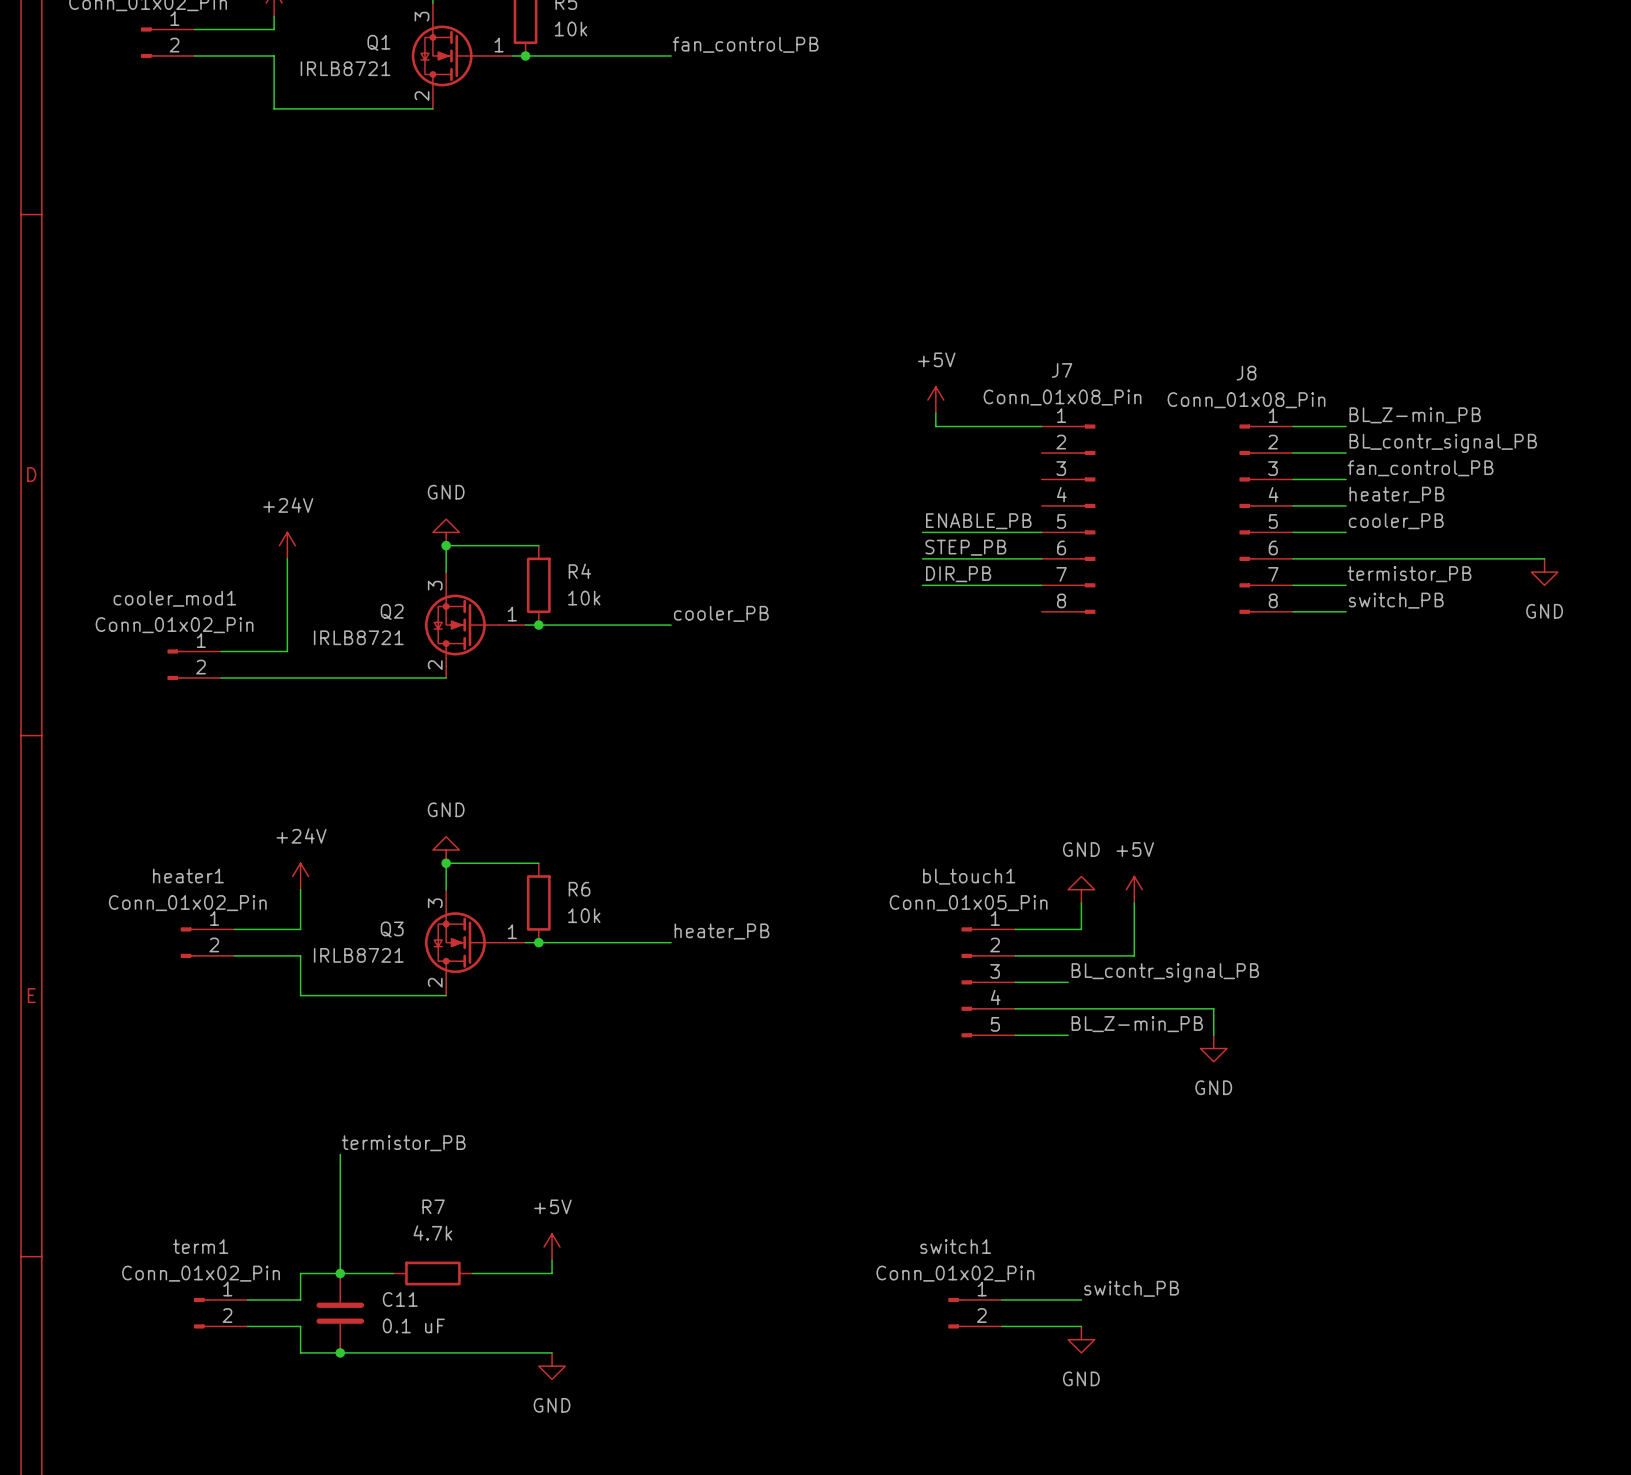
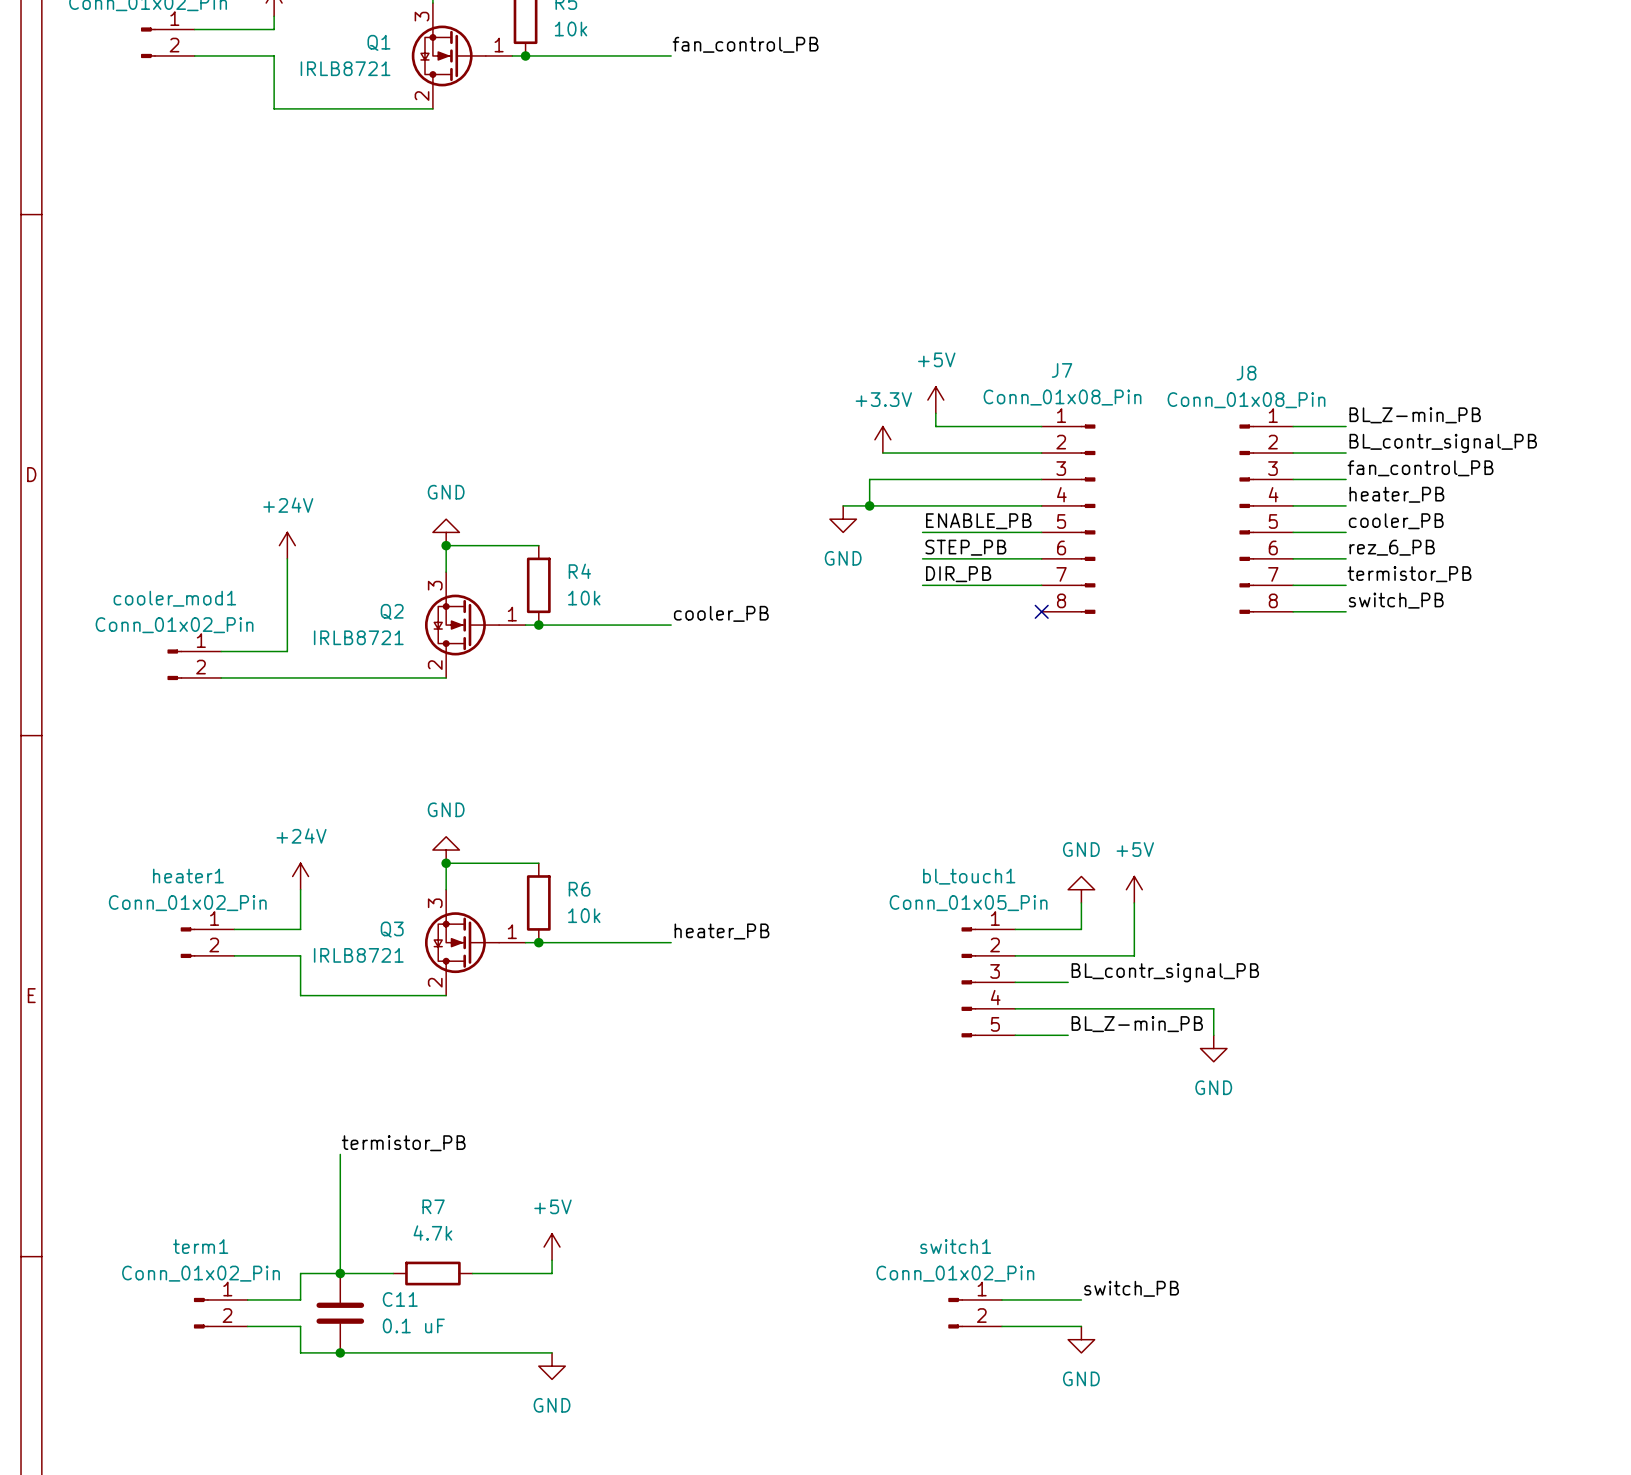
power symbol: none -> +3.3V (882, 439)
wire: none -> (882, 453) (1041, 453)
wire: none -> (1041, 479) (869, 479) (869, 505)
wire: none -> (843, 505) (1041, 505)
junction: none -> (869, 505)
power symbol: none -> GND (843, 519)
label: none -> rez_6_PB (1392, 547)
wire: (1346, 558) (1544, 558) -> none
power symbol: GND (1544, 572) -> none
no-connect mark: none -> (1041, 611)

